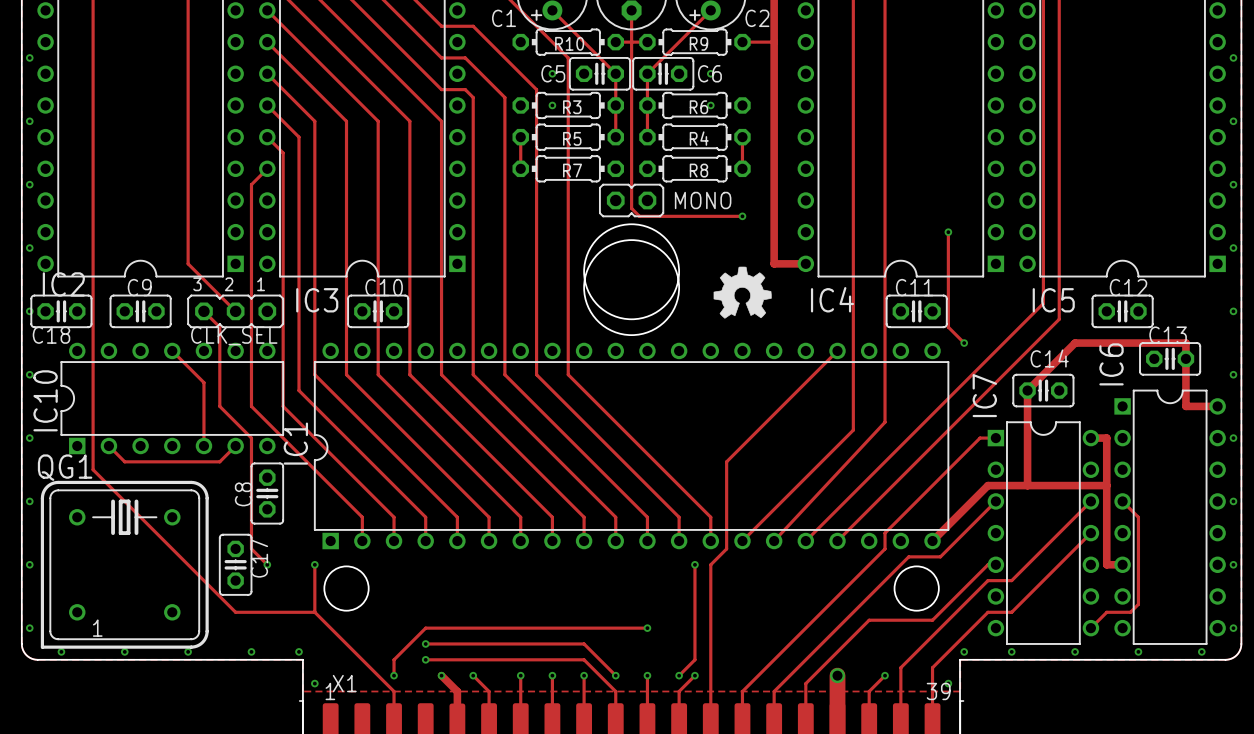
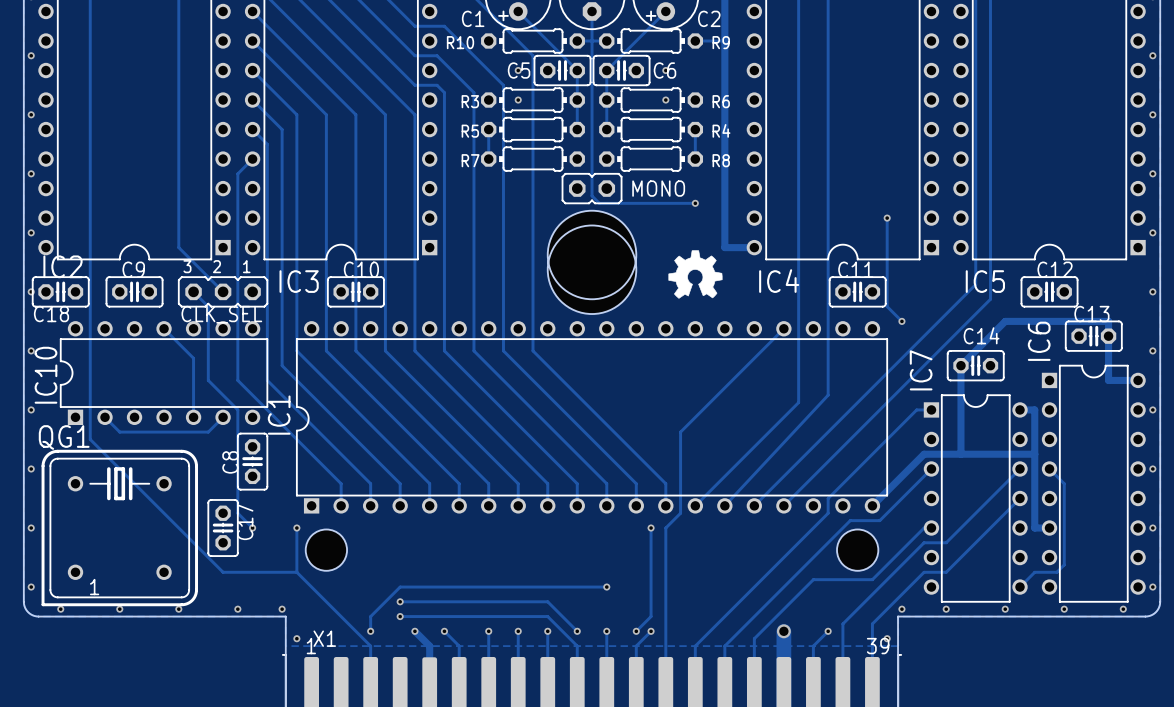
R10 name position: R10 (569, 43) -> R10 (460, 42)
R9 name position: R9 (698, 43) -> R9 (721, 42)
R3 name position: R3 (572, 107) -> R3 (470, 101)
R6 name position: R6 (698, 107) -> R6 (721, 101)
R5 name position: R5 (572, 138) -> R5 (470, 131)
R4 name position: R4 (699, 138) -> R4 (721, 130)
R7 name position: R7 (572, 170) -> R7 (470, 160)
R8 name position: R8 (698, 170) -> R8 (721, 160)

